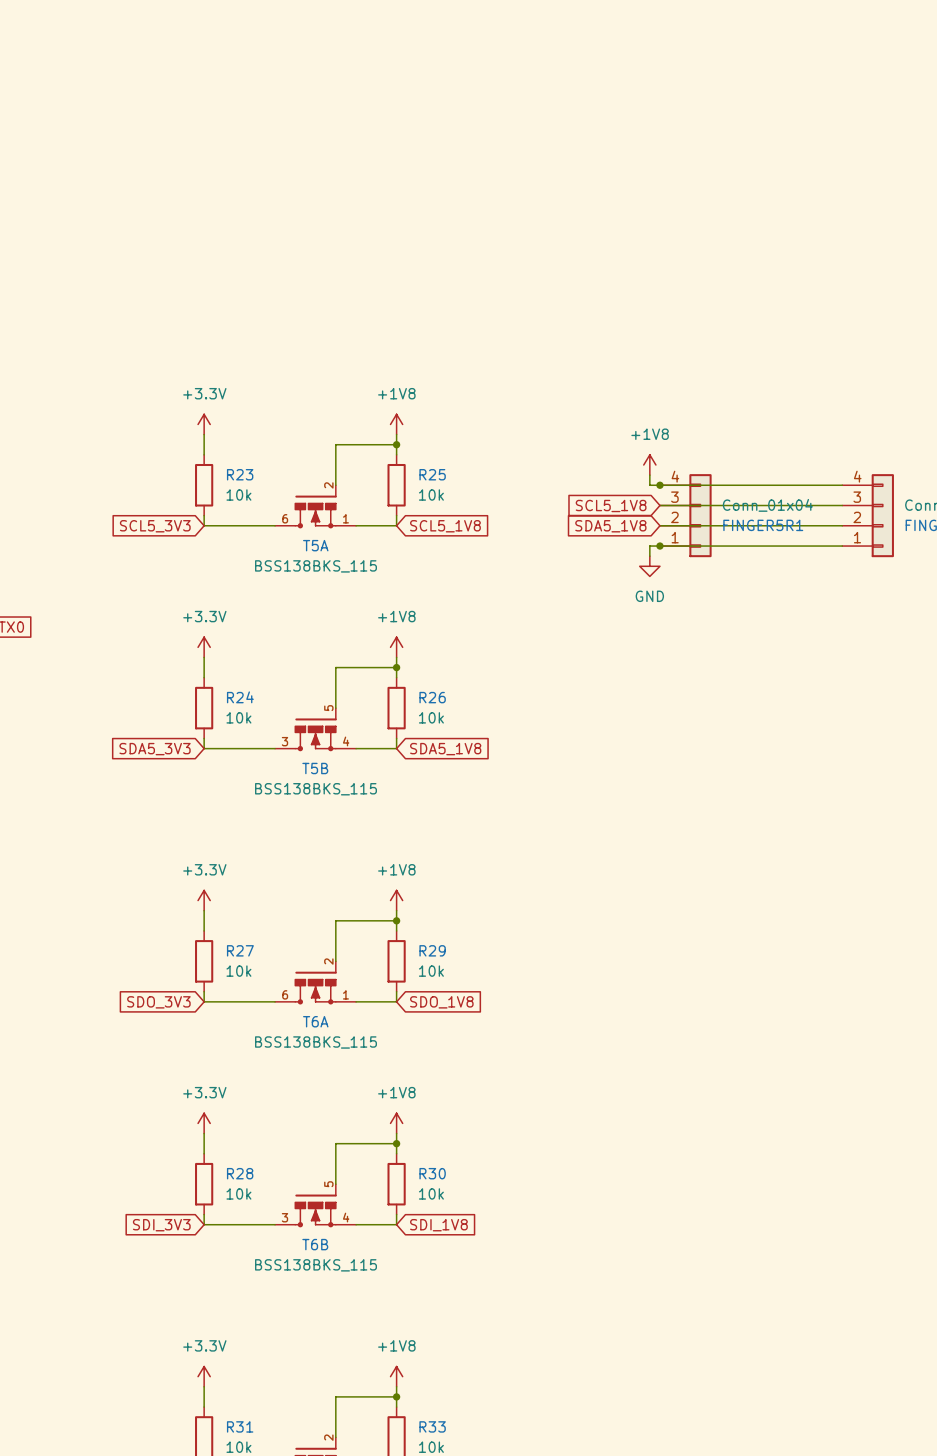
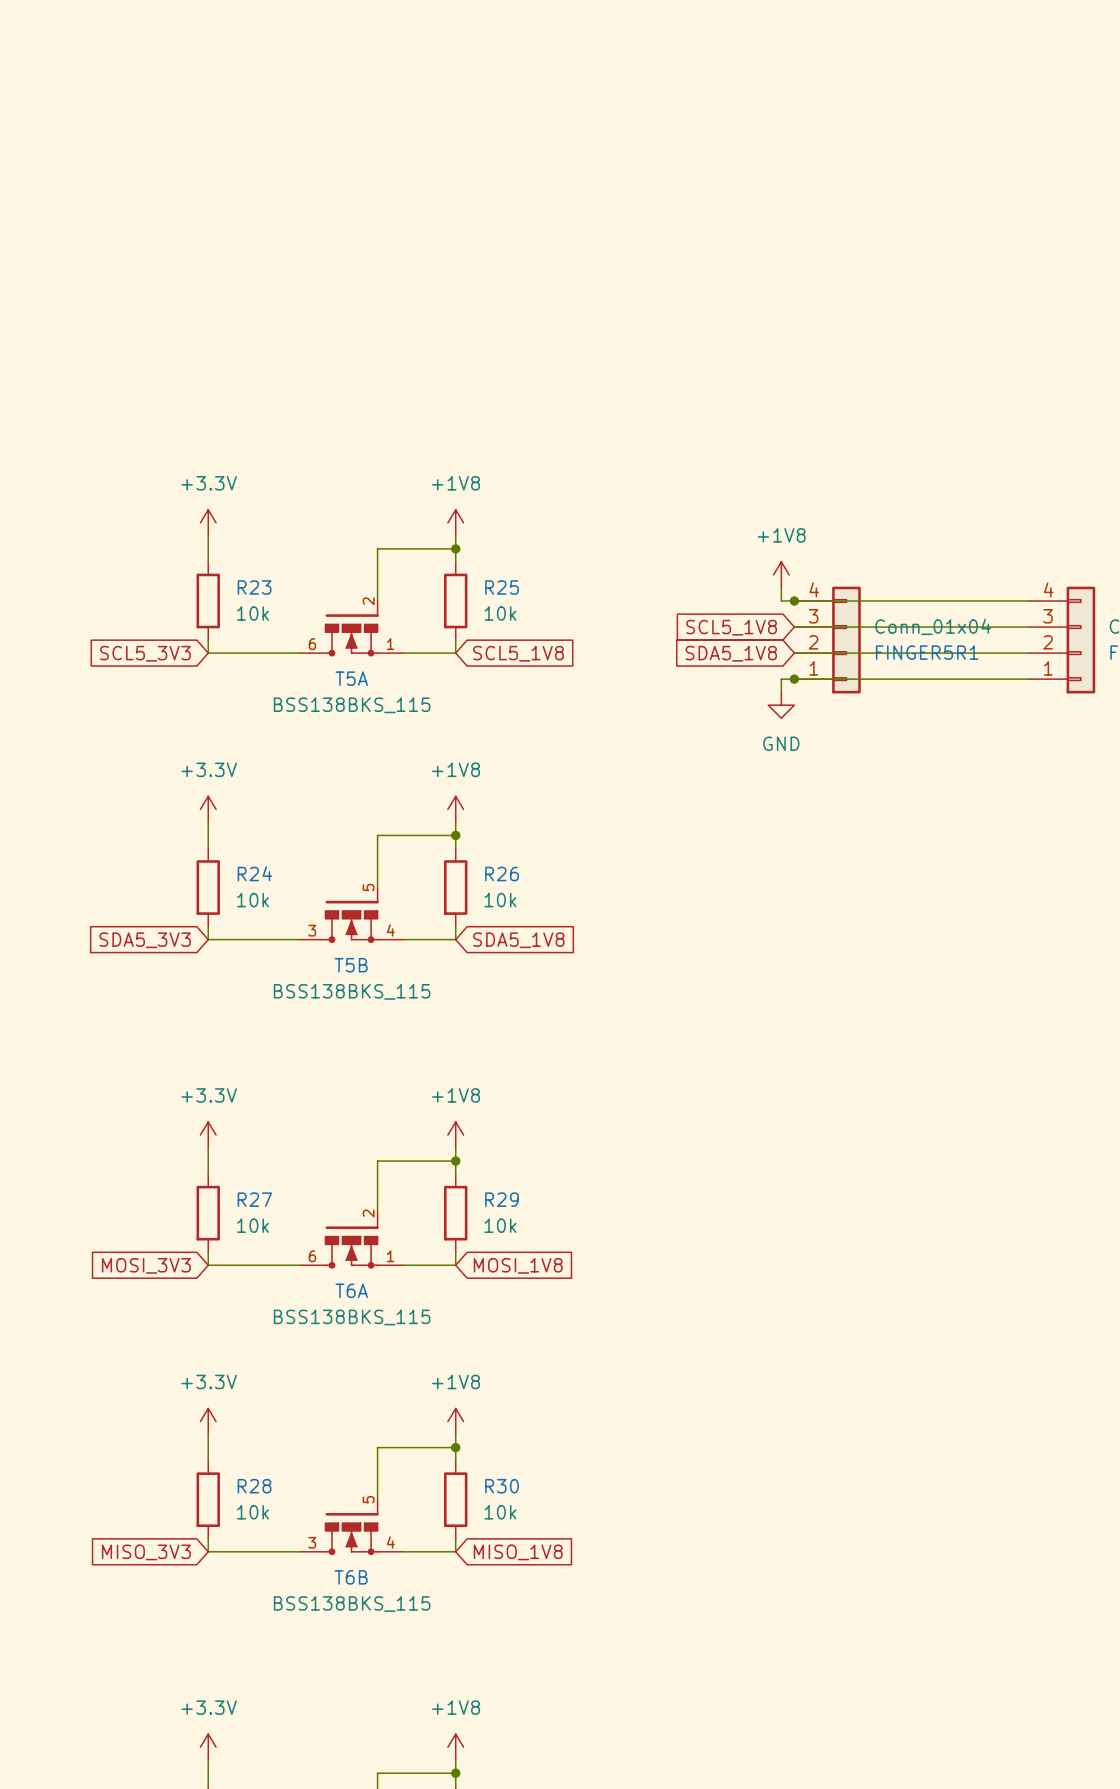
global label: SDO_3V3 (158, 1002) -> MOSI_3V3 (146, 1265)
global label: SDO_1V8 (441, 1002) -> MOSI_1V8 (518, 1265)
global label: SDI_3V3 (161, 1225) -> MISO_3V3 (146, 1552)
global label: SDI_1V8 (438, 1225) -> MISO_1V8 (518, 1552)

